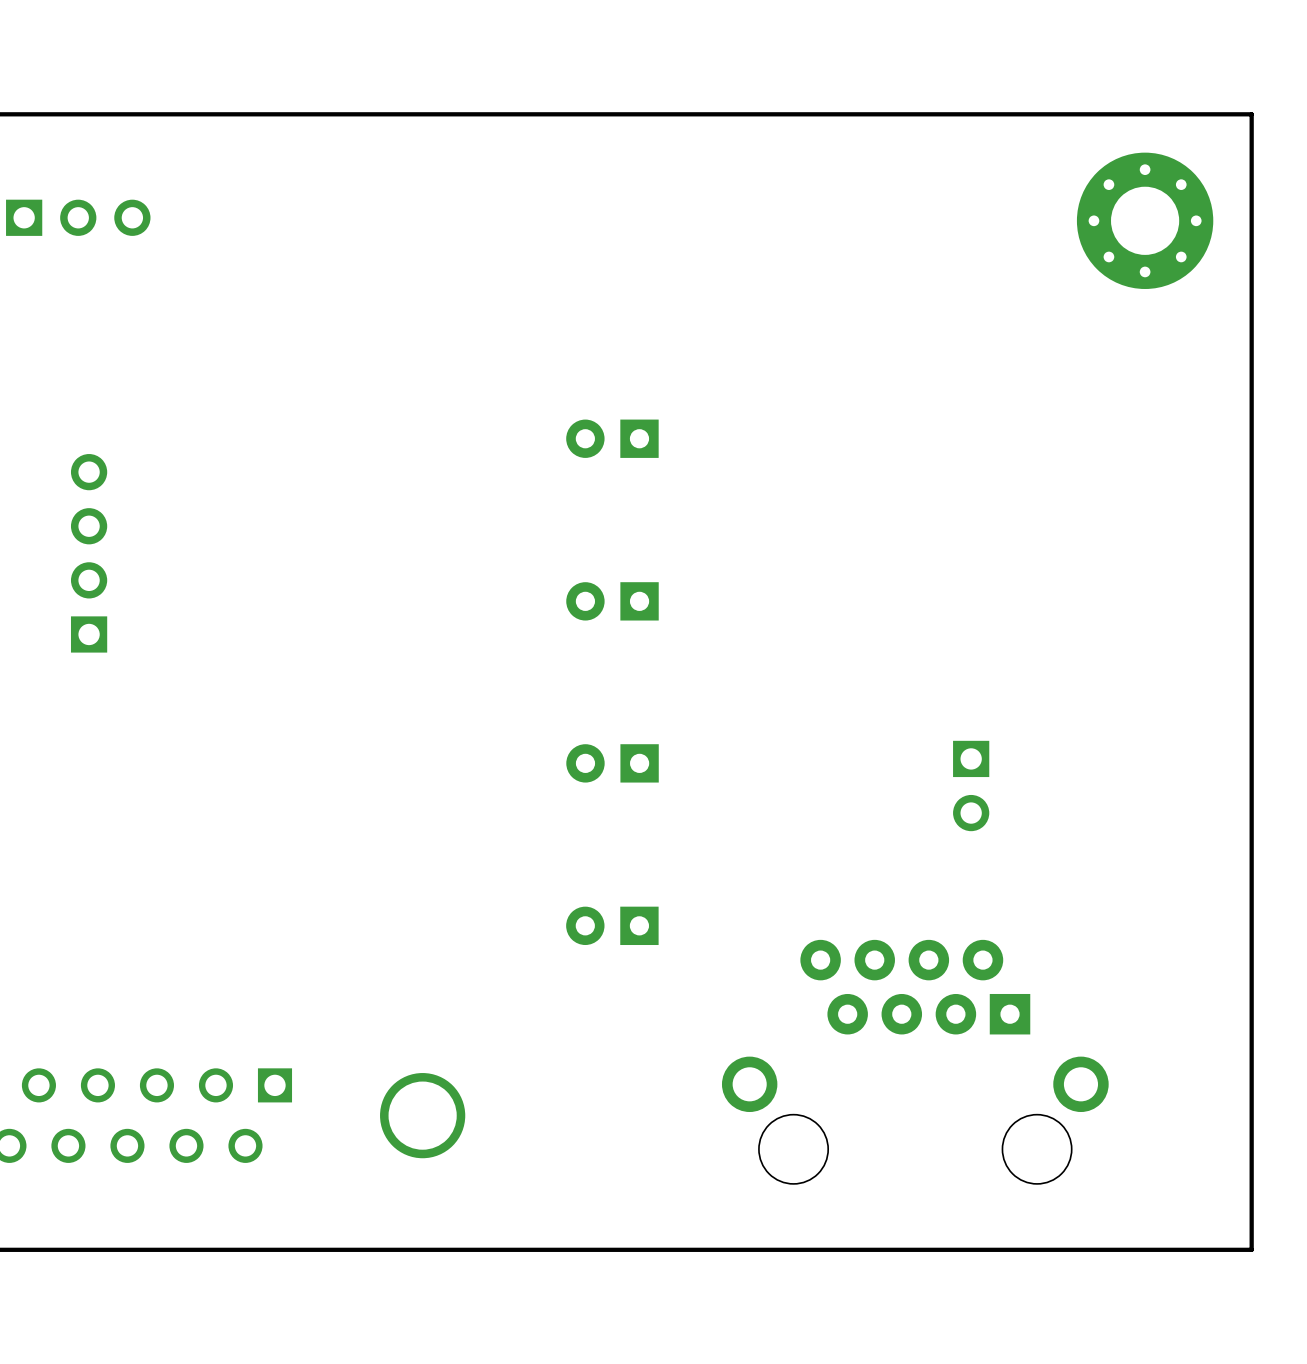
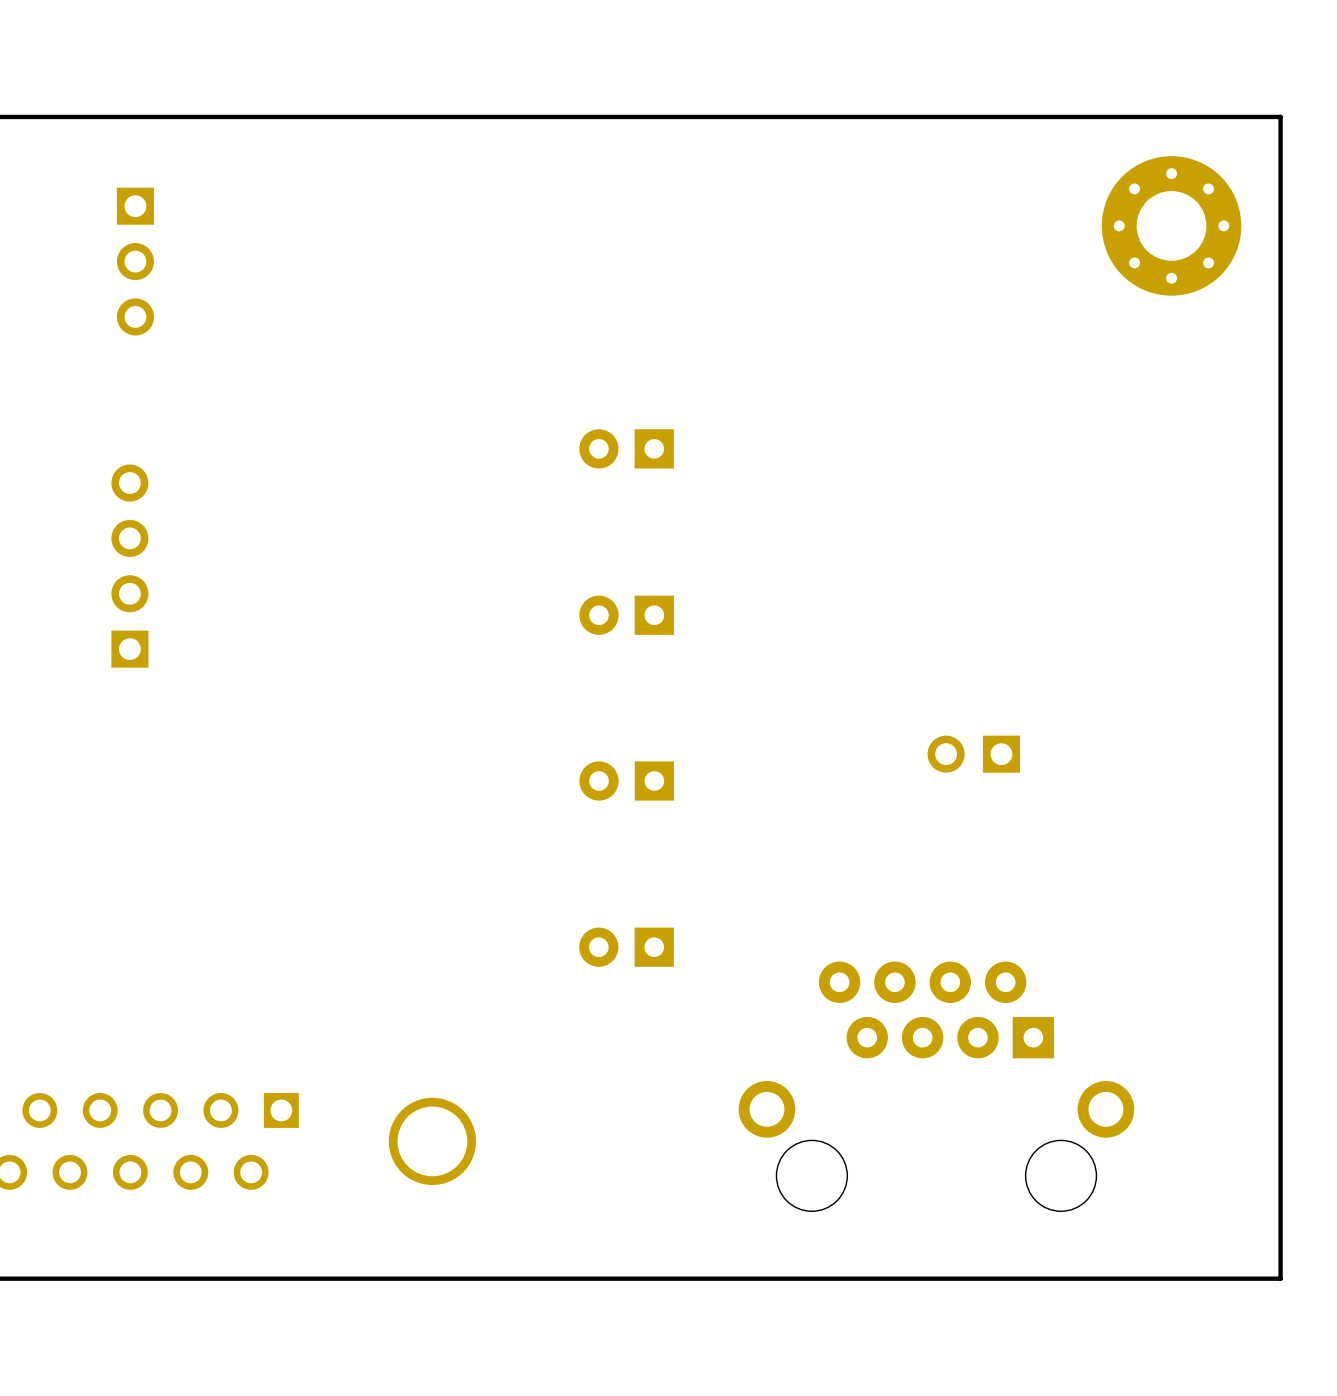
part rotation: 0° (78, 217) -> 90° clockwise (135, 261)
part position: (89, 553) -> (129, 566)
part rotation: 0° (971, 786) -> 90° clockwise (973, 754)

